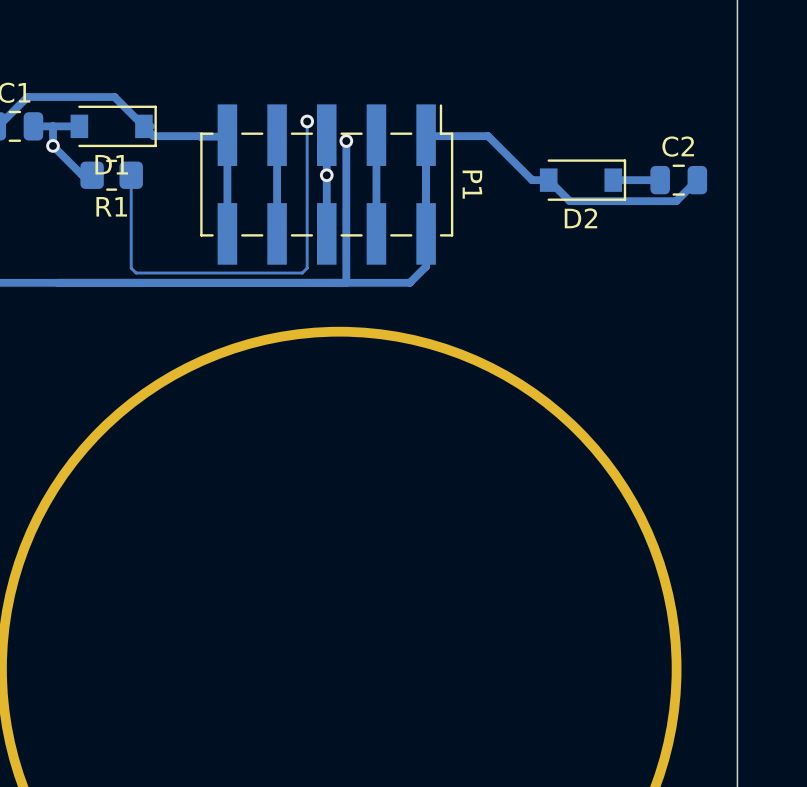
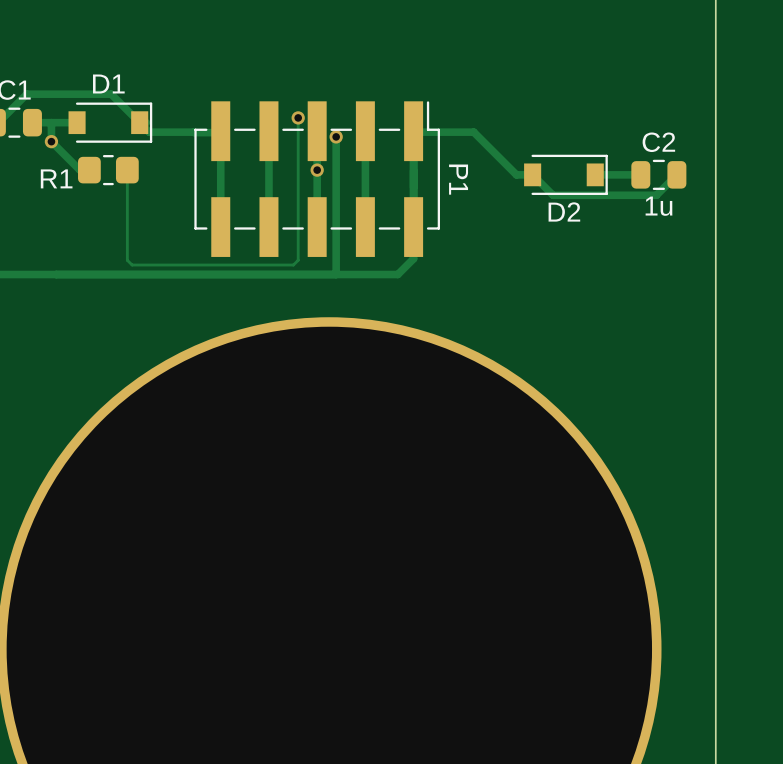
D1 name position: D1 (111, 164) -> D1 (108, 83)
R1 name position: R1 (111, 206) -> R1 (56, 178)
C2 value: none -> 1u (658, 206)

